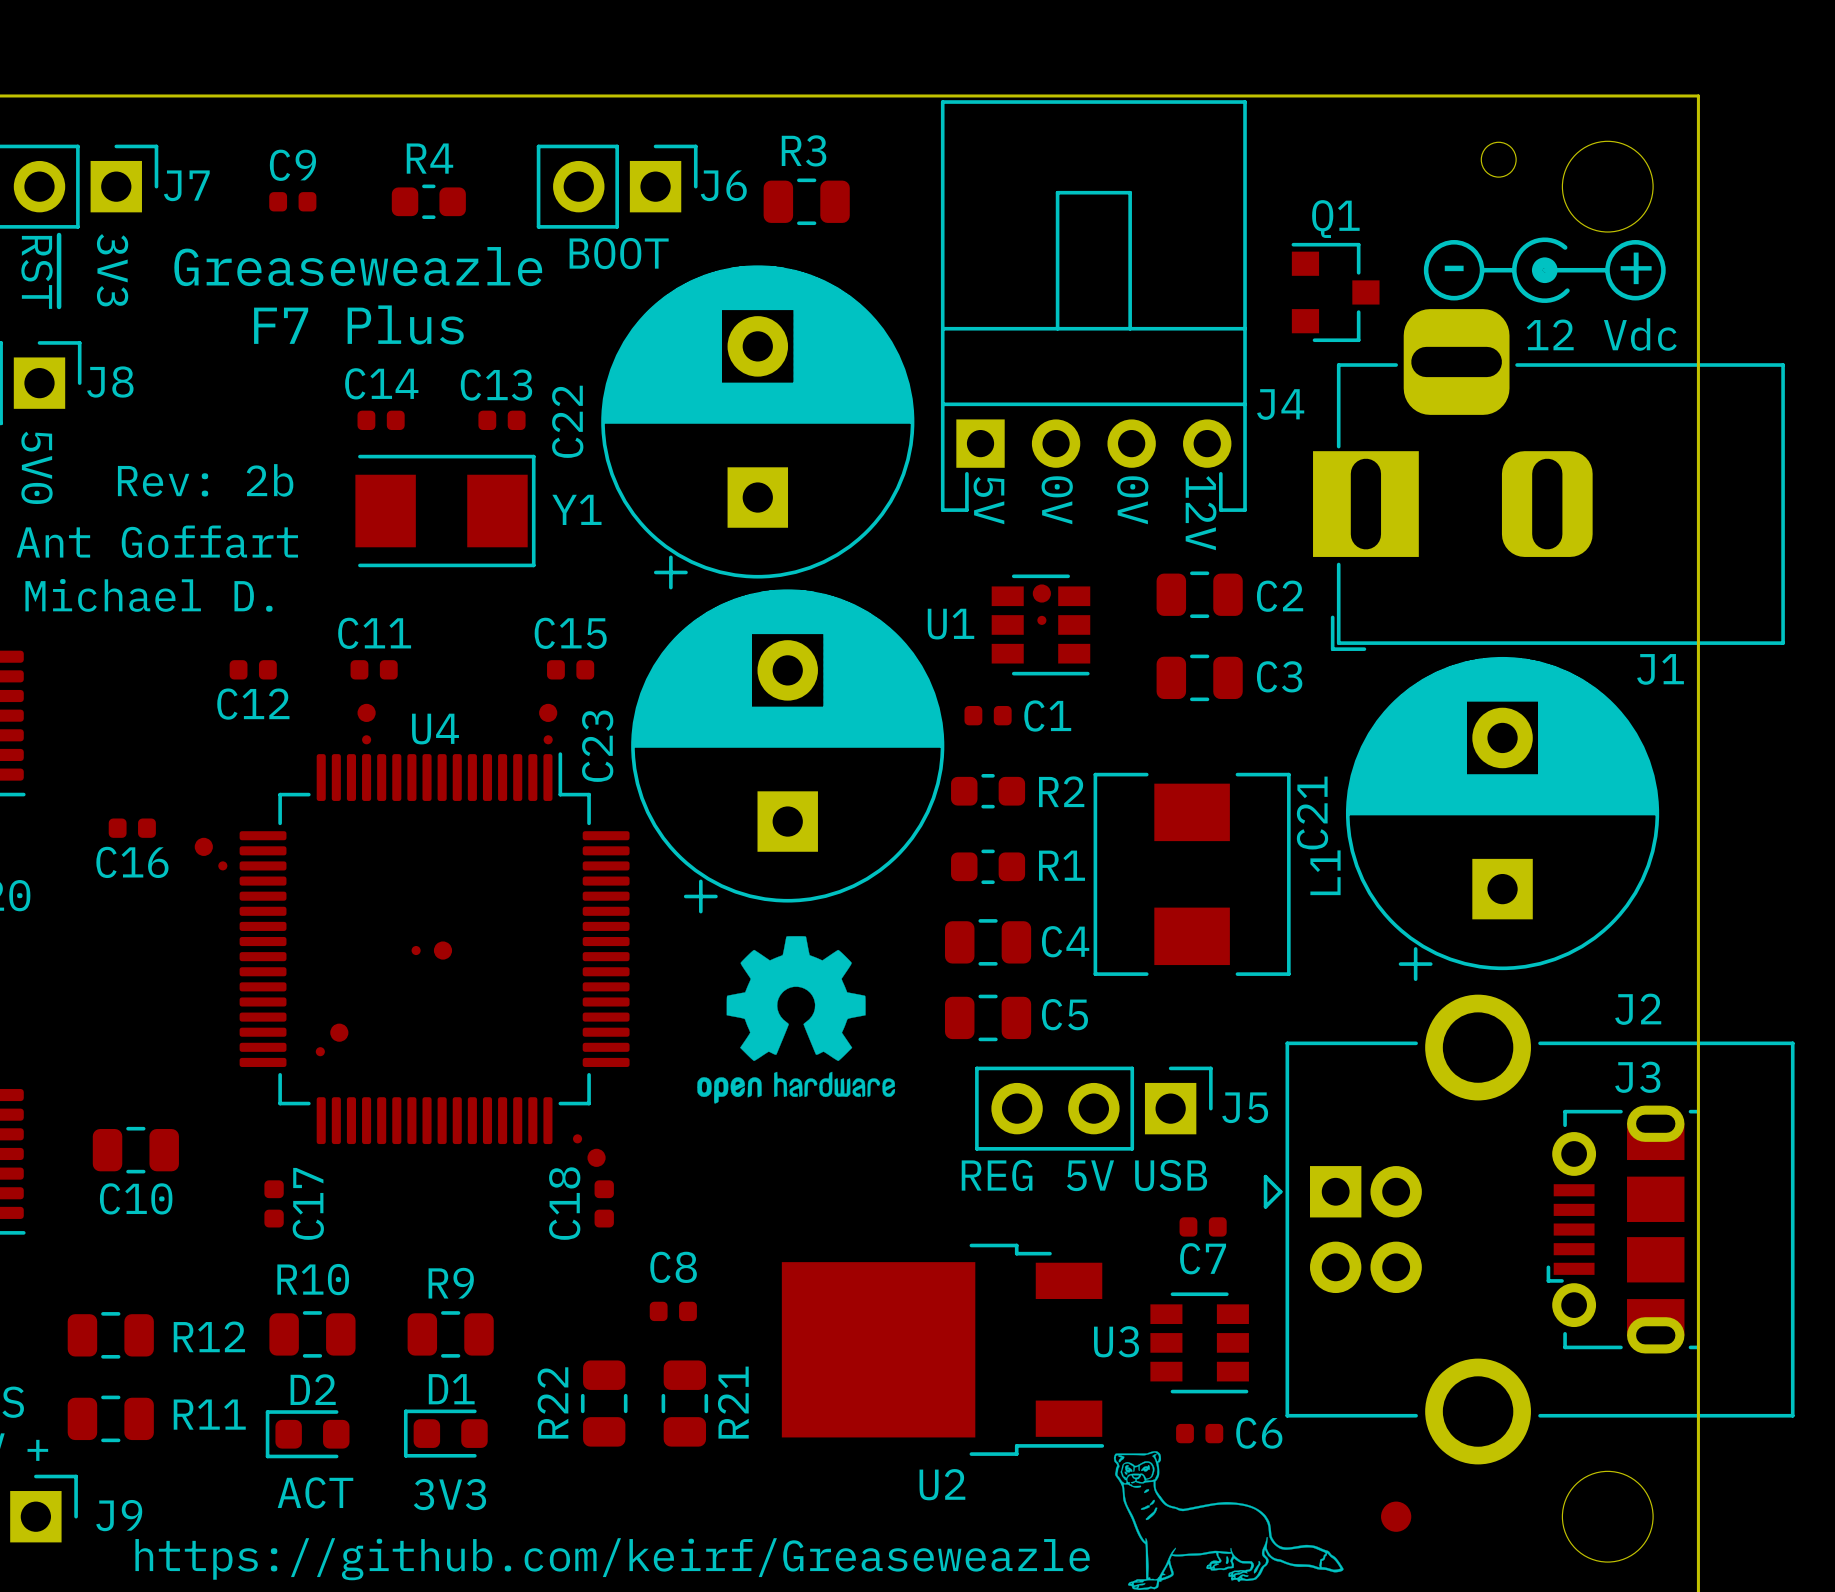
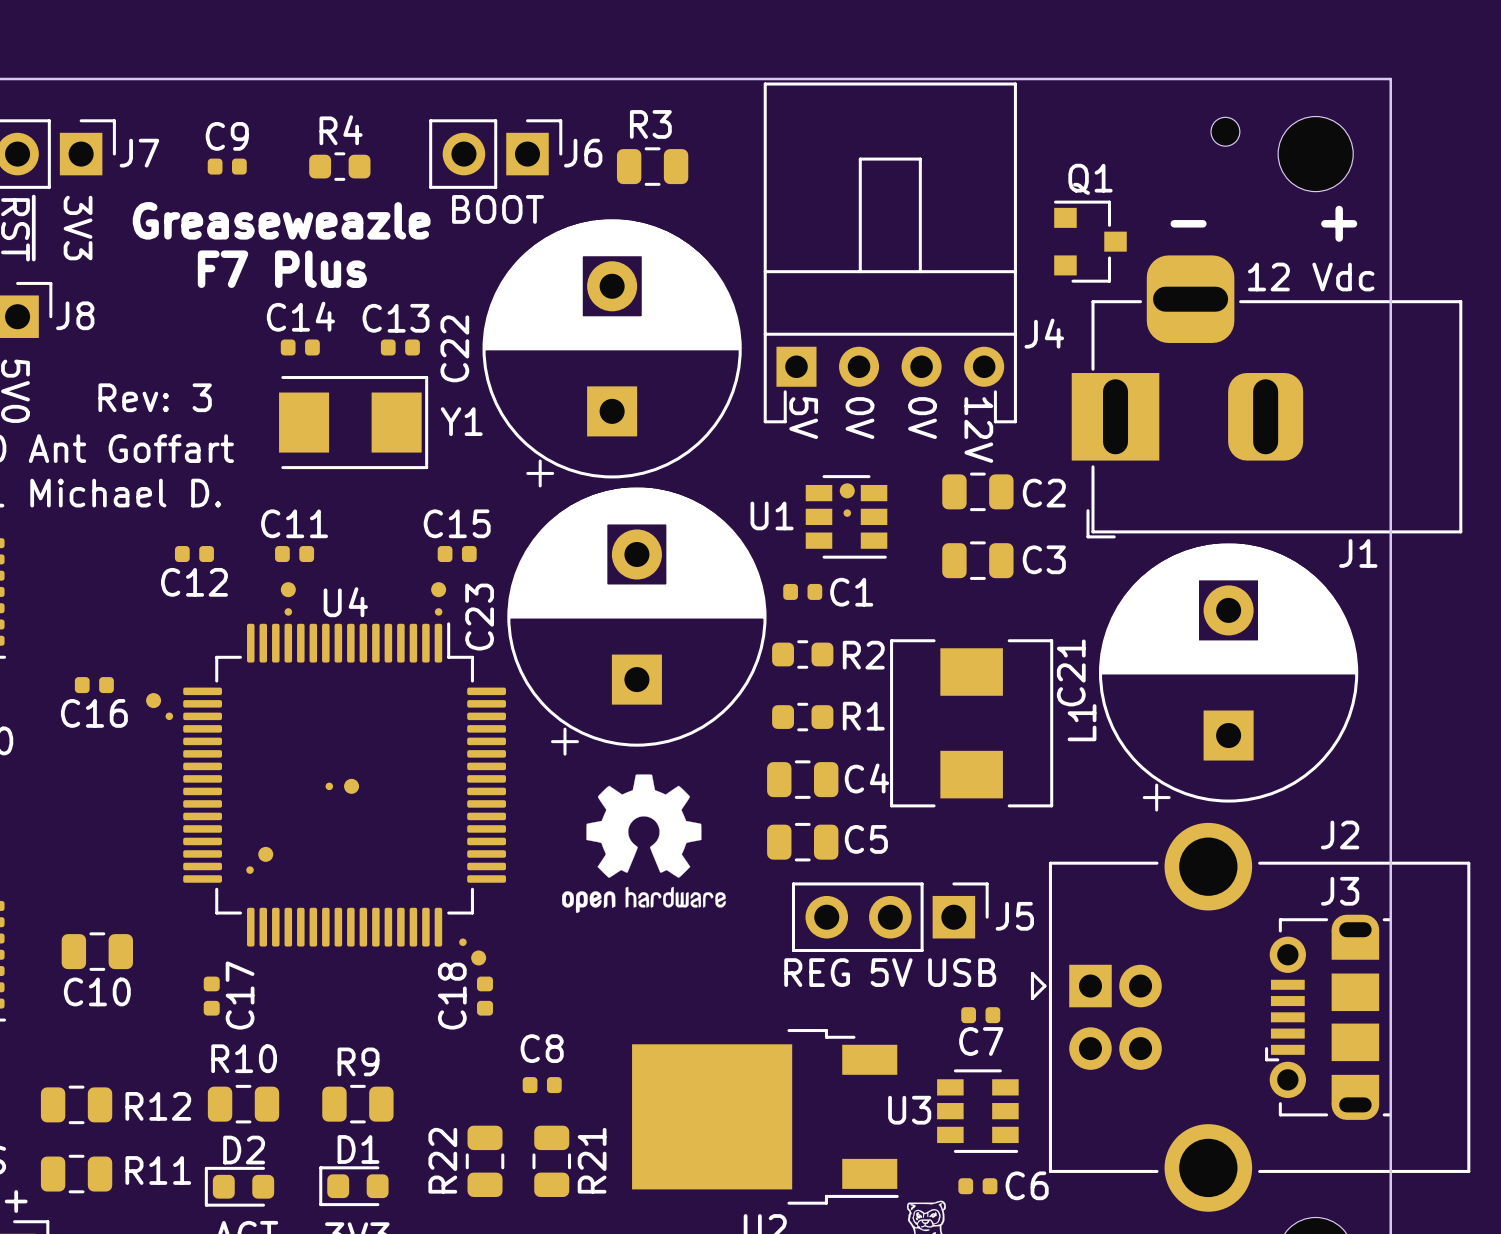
drawing: [1423, 237, 1666, 303] -> none
text: Rev: 2b (205, 480) -> Rev: 3 (155, 397)

